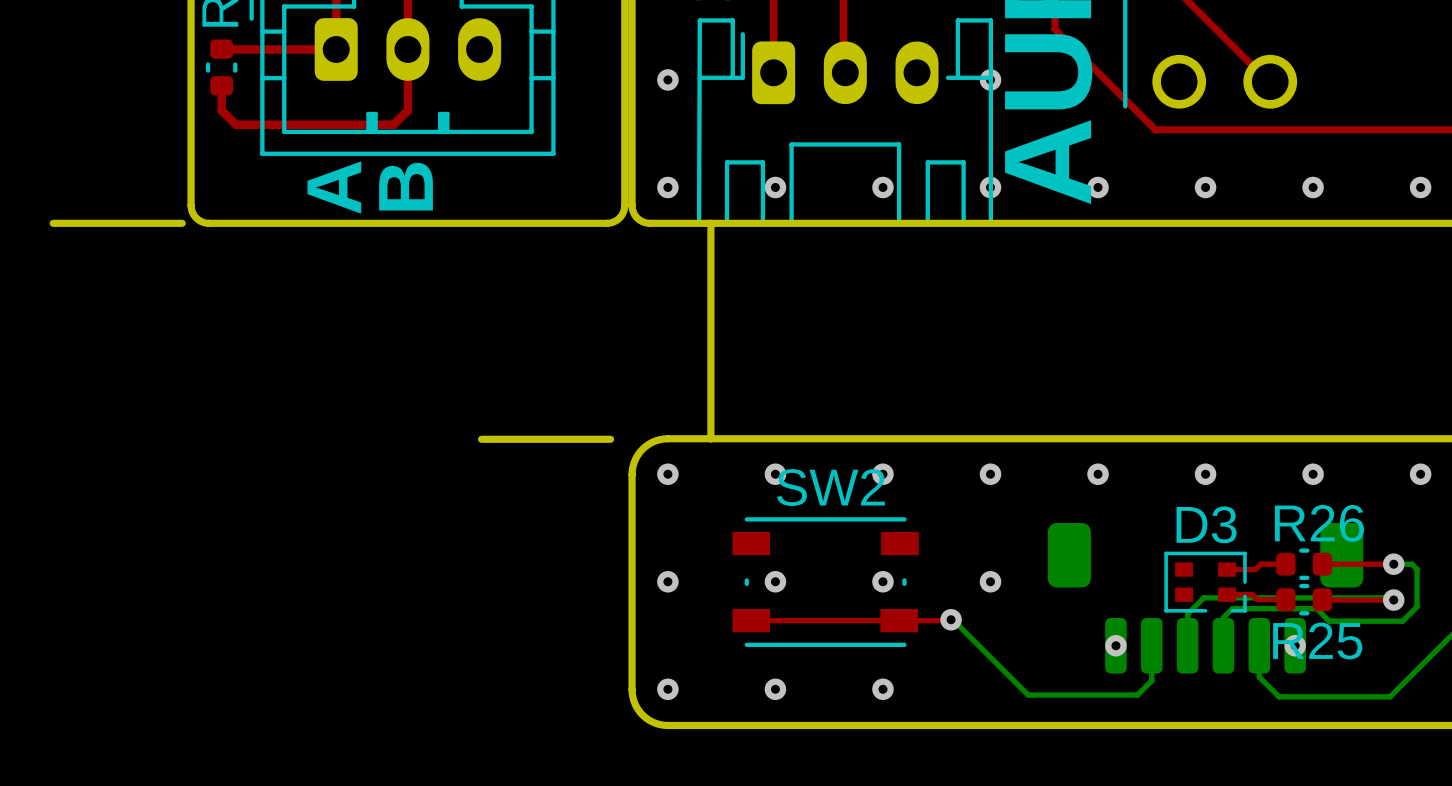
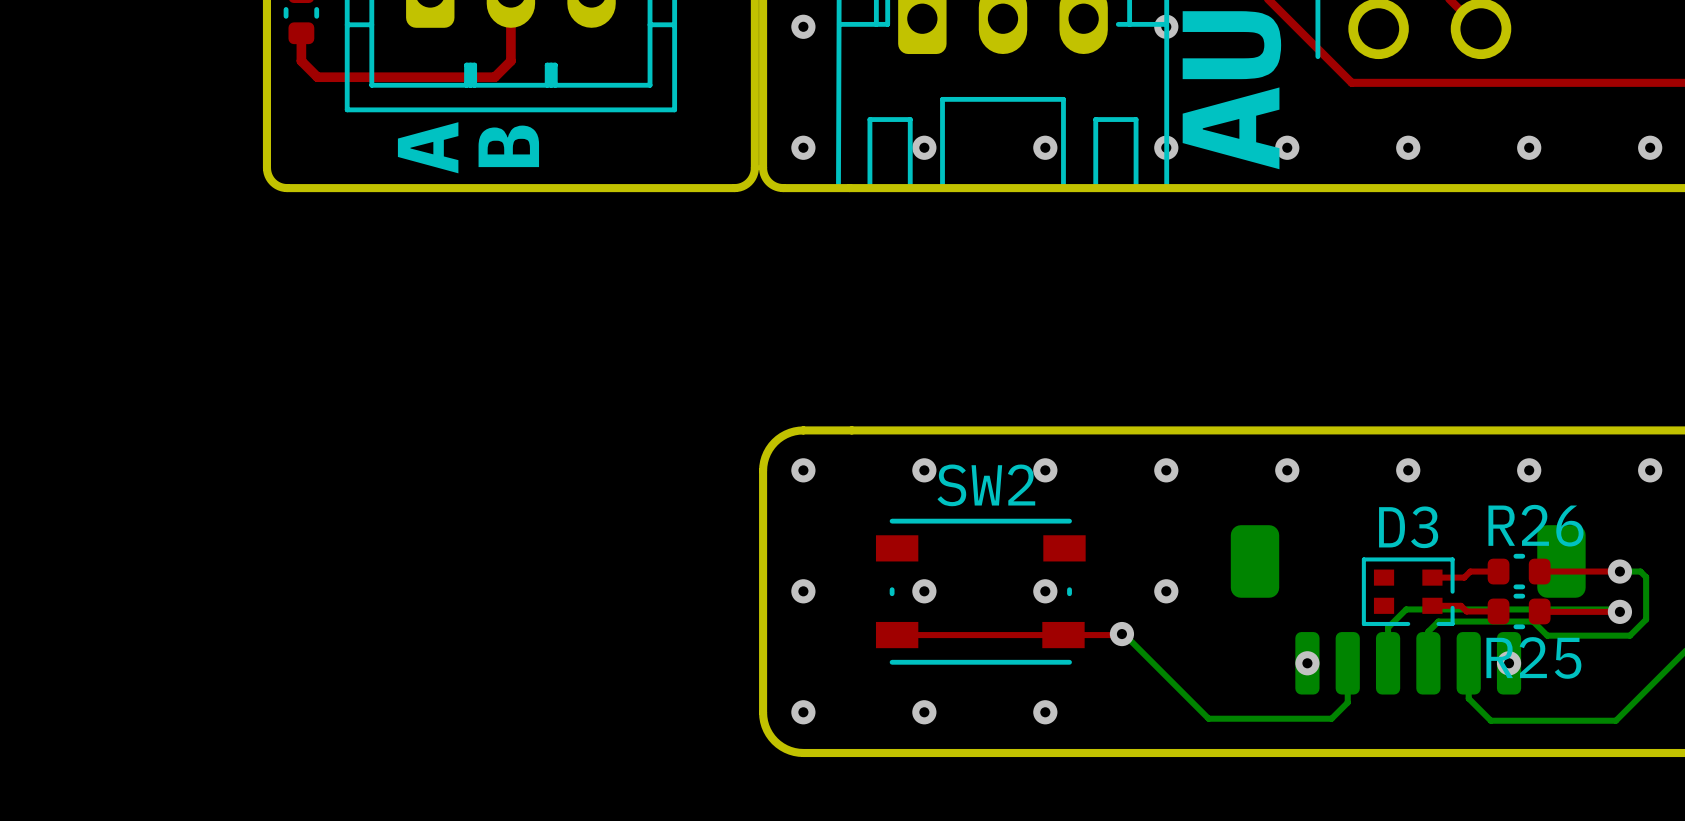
board edge: (53, 223) (182, 223) -> none
board edge: (710, 223) (710, 438) -> none
board edge: (481, 439) (610, 439) -> none

